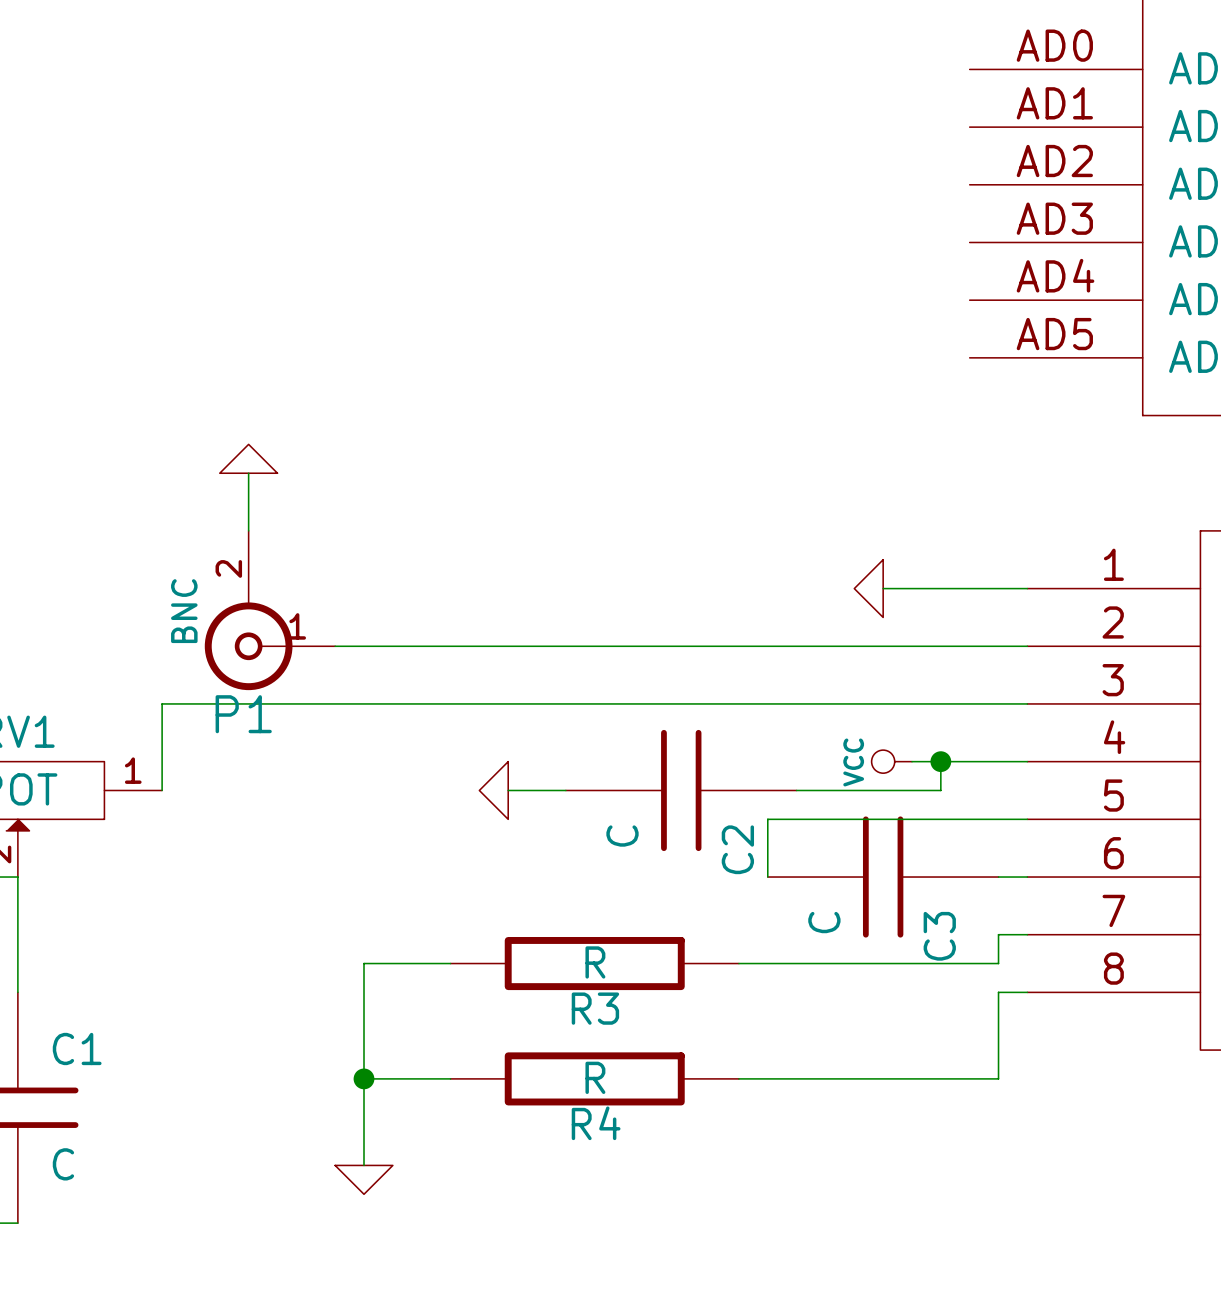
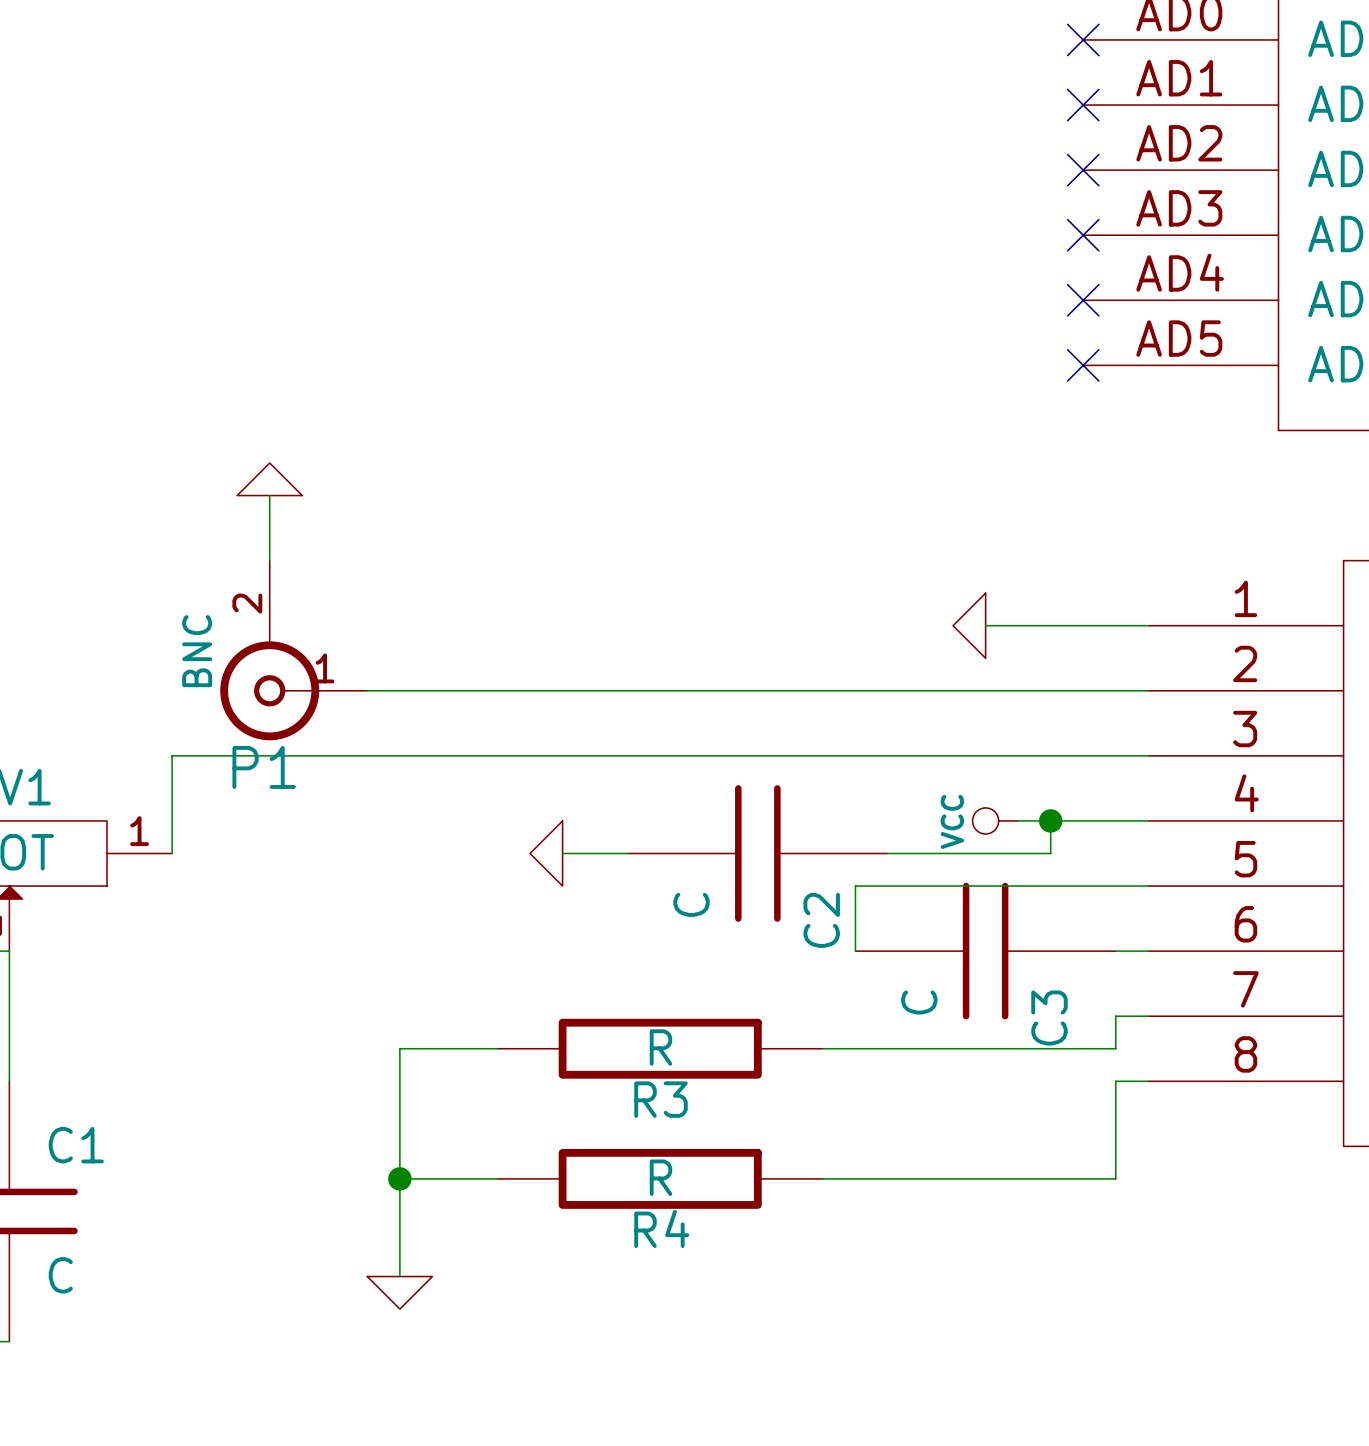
no-connect mark: none -> (1083, 39)
no-connect mark: none -> (1083, 105)
no-connect mark: none -> (1083, 170)
no-connect mark: none -> (1083, 235)
no-connect mark: none -> (1083, 300)
no-connect mark: none -> (1083, 365)

